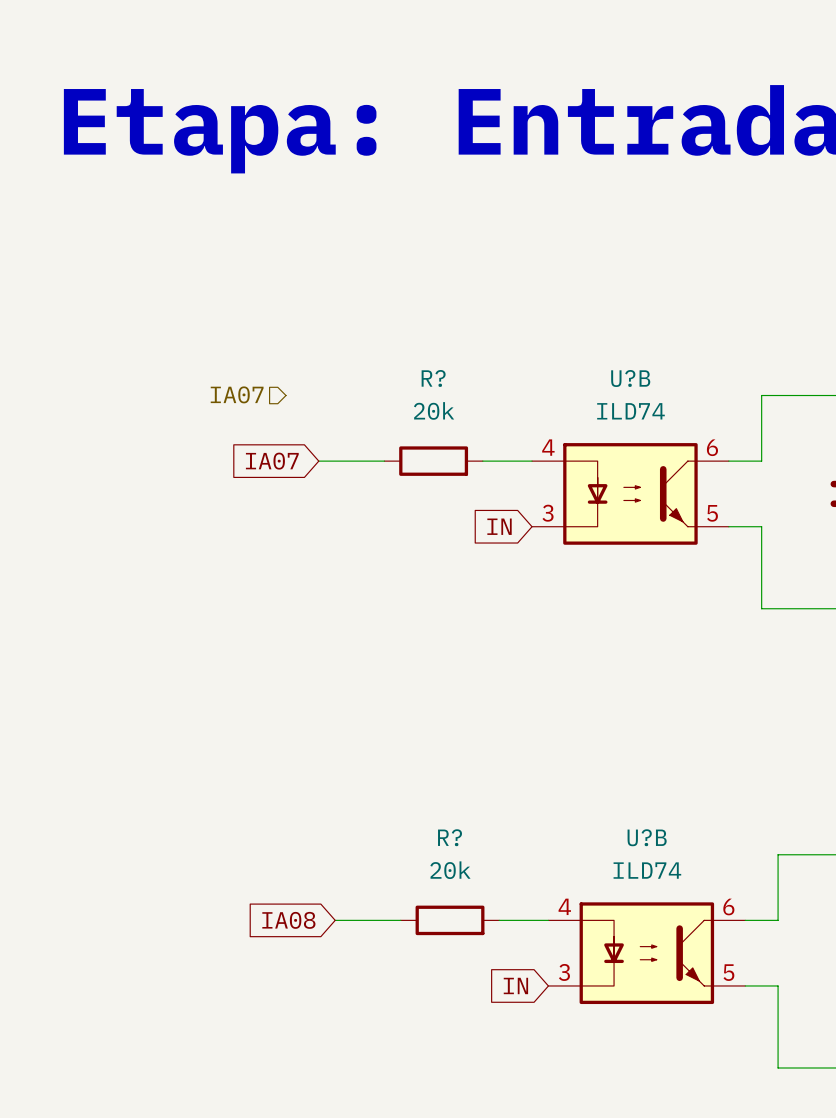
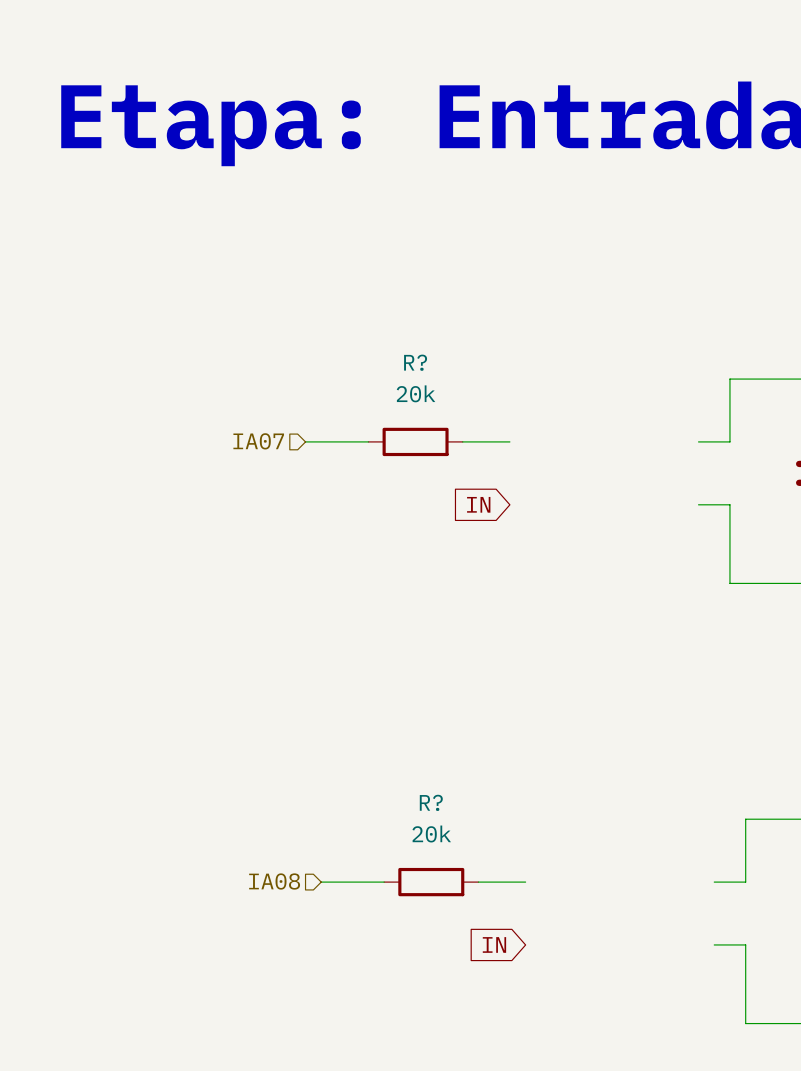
hierarchical label position: IA07 (237, 394) -> IA07 (258, 441)
global label: IA07 (272, 461) -> none
U?B: ILD74 (630, 493) -> none
hierarchical label: none -> IA08 (274, 881)
global label: IA08 (288, 920) -> none
U?B: ILD74 (646, 953) -> none

